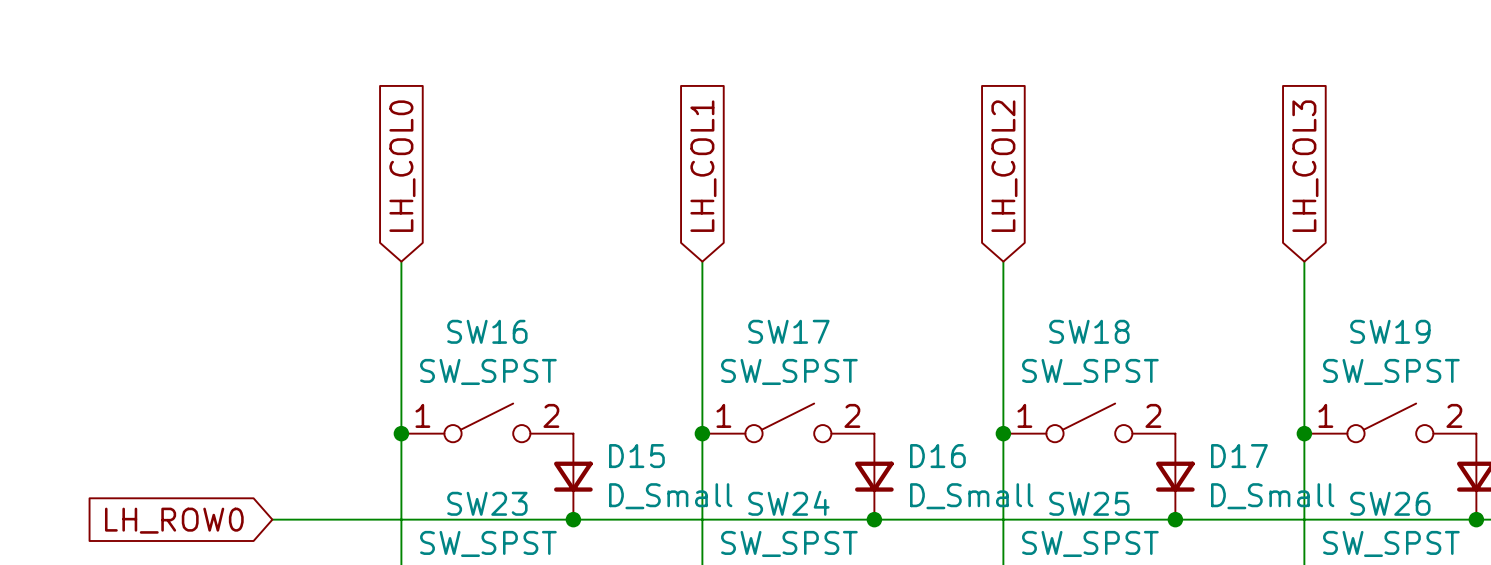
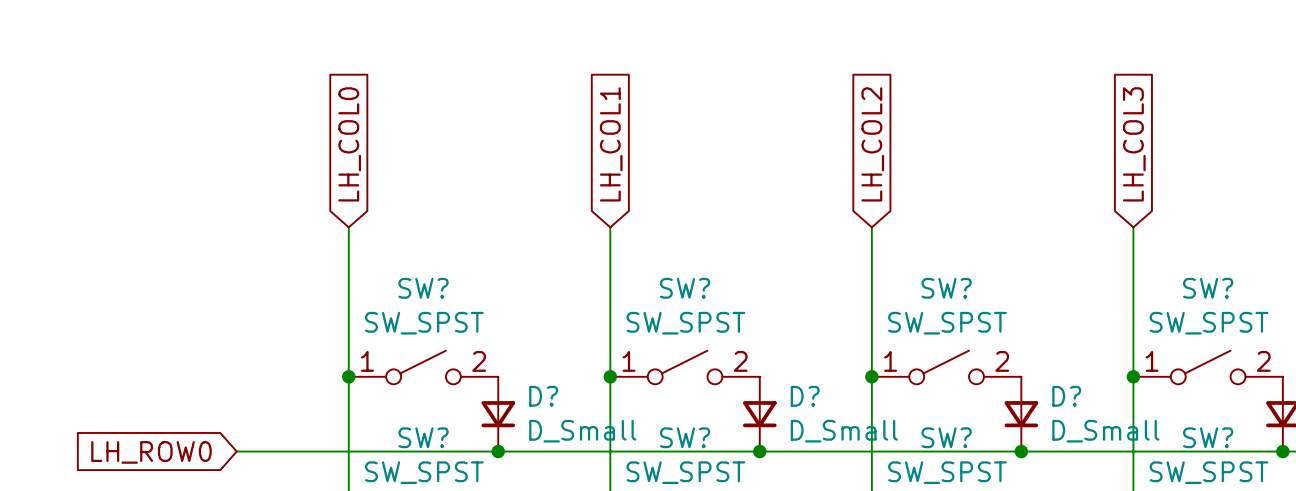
SW16 name: SW16 (487, 331) -> SW? (423, 288)
SW17 name: SW17 (788, 331) -> SW? (685, 288)
SW18 name: SW18 (1089, 331) -> SW? (946, 288)
SW19 name: SW19 (1390, 331) -> SW? (1208, 288)
D15 name: D15 (636, 456) -> D? (543, 396)
D16 name: D16 (937, 456) -> D? (805, 396)
D17 name: D17 (1239, 456) -> D? (1066, 396)
SW23 name: SW23 (487, 503) -> SW? (423, 437)
SW24 name: SW24 (788, 503) -> SW? (685, 437)
SW25 name: SW25 (1089, 503) -> SW? (946, 437)
SW26 name: SW26 (1390, 503) -> SW? (1208, 437)

